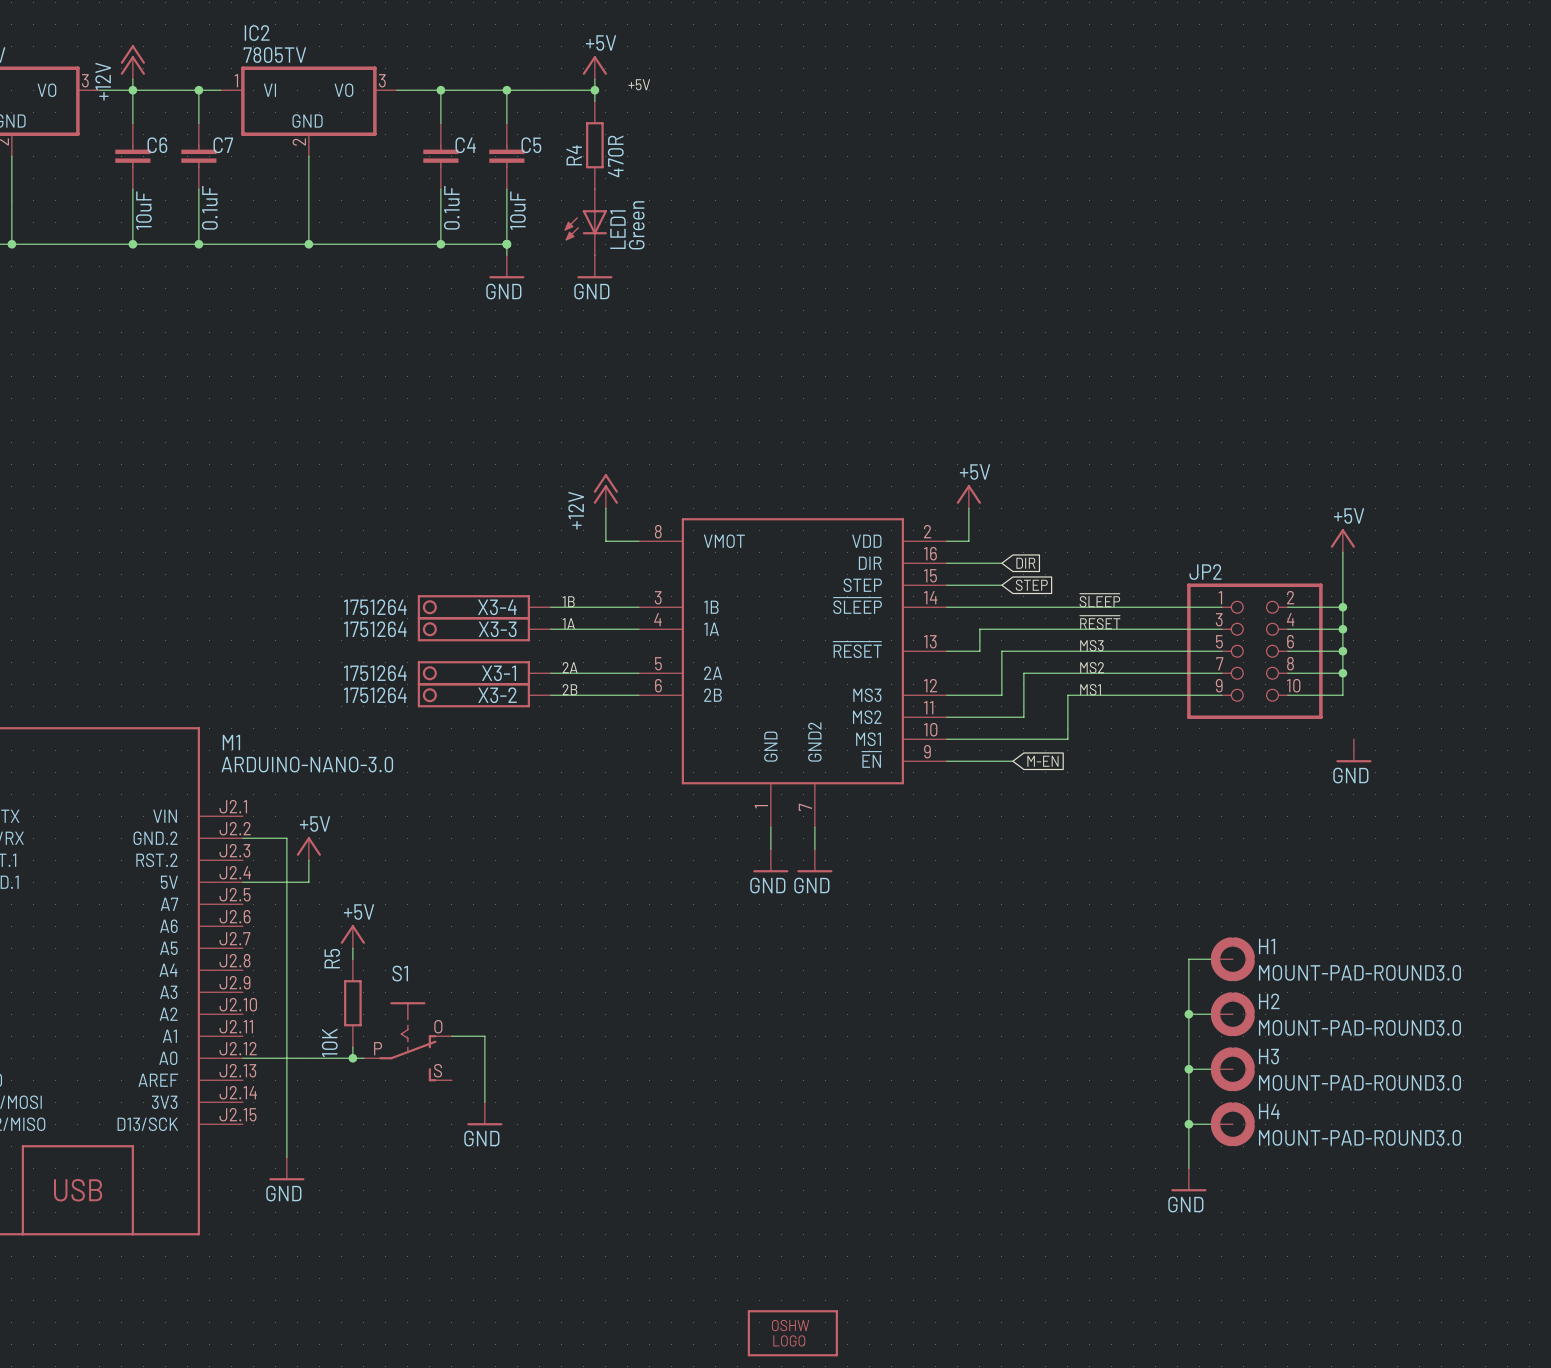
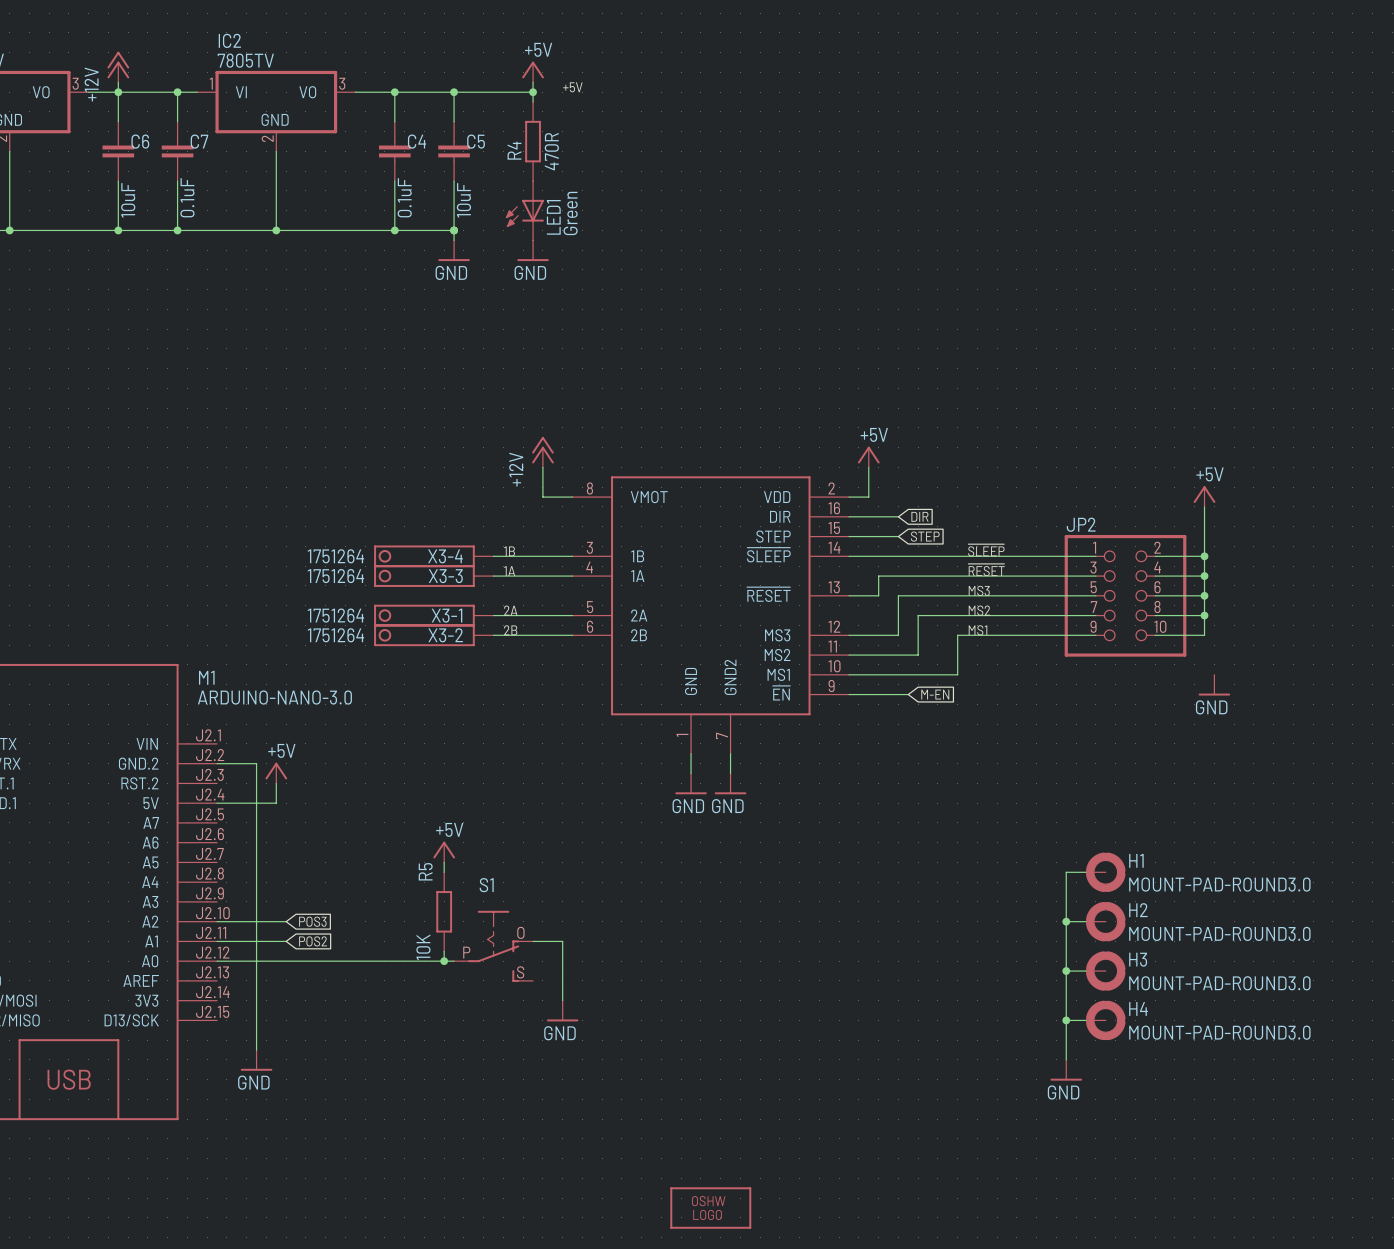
power symbol position: +5V (352, 936) -> +5V (444, 852)
wire: (352, 948) (352, 959) -> (444, 862) (444, 872)
R5 position: (352, 1003) -> (444, 911)
wire: none -> (217, 921) (286, 921)
global label: none -> POS3 (312, 921)
wire: none -> (217, 941) (286, 941)
global label: none -> POS2 (313, 941)
wire: (451, 1036) (484, 1036) (484, 1102) -> (533, 941) (562, 941) (562, 1000)
S1 position: (407, 1041) -> (493, 946)
wire: (352, 1047) (352, 1058) -> (444, 951) (444, 961)
junction: (352, 1058) -> none
wire: none -> (325, 961) (454, 961)
junction: none -> (444, 961)
power symbol position: GND (484, 1113) -> GND (562, 1011)

